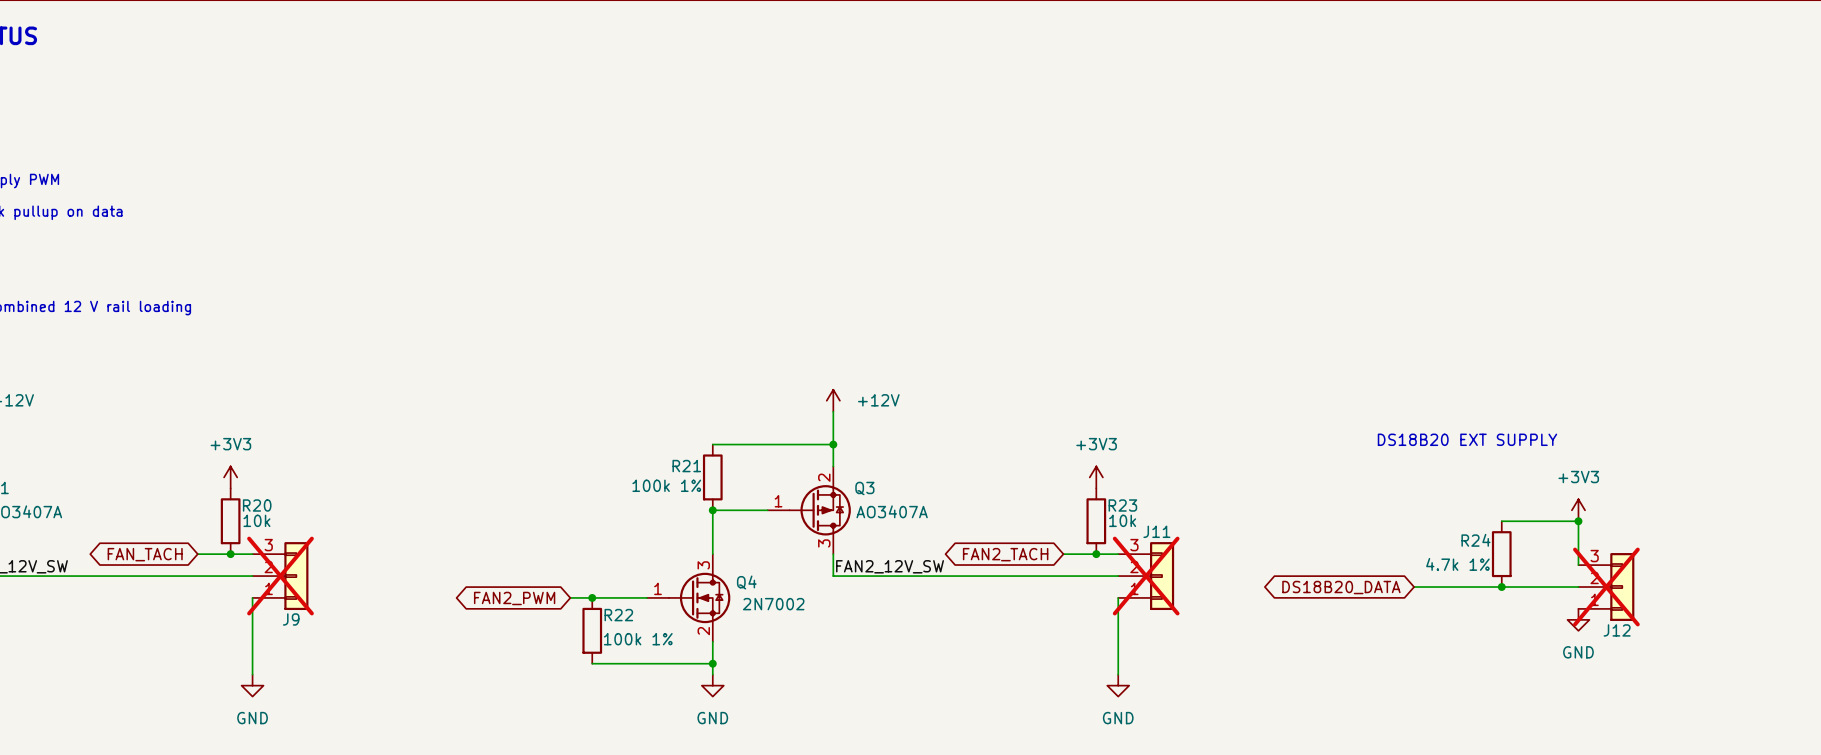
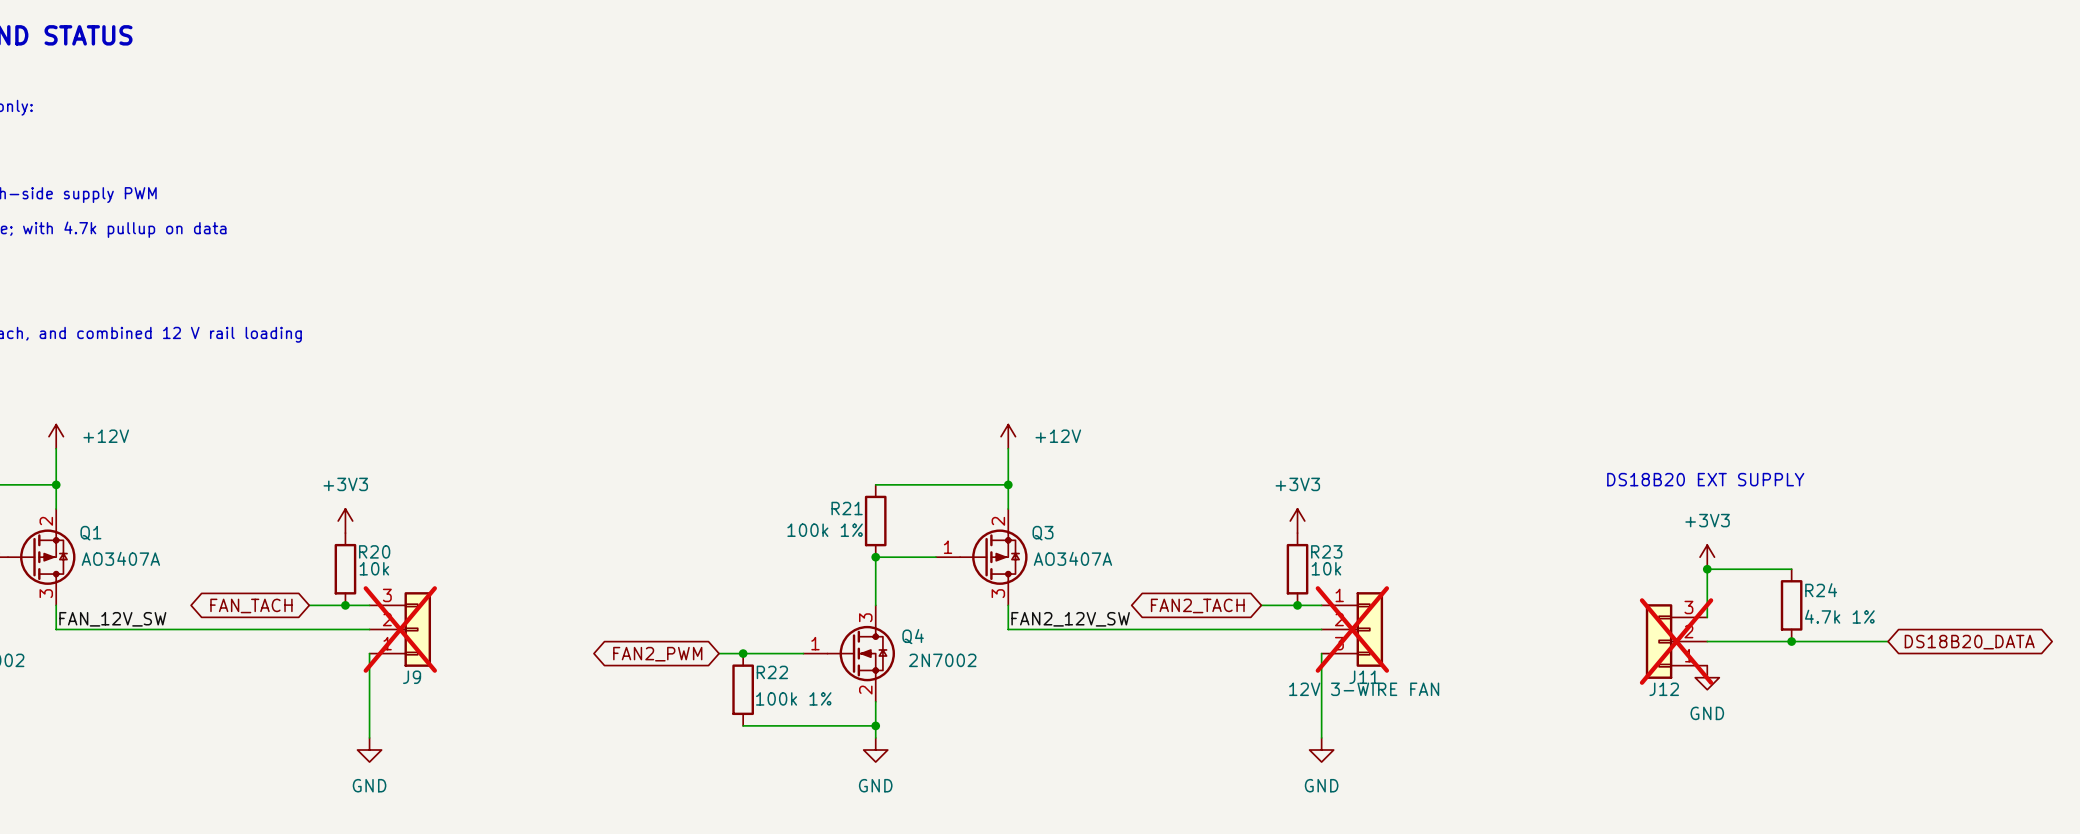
power symbol position: +3V3 (1578, 510) -> +3V3 (1707, 557)
junction: none -> (1707, 569)
wire: none -> (1743, 569) (1707, 569) (1707, 617)
wire: (1545, 521) (1578, 521) (1578, 565) -> none
junction: (1578, 521) -> none
R24 name position: R24 (1475, 540) -> R24 (1821, 590)
R24 position: (1501, 554) -> (1791, 605)
R24 value position: 4.7k 1% (1457, 564) -> 4.7k 1% (1839, 616)
J11 flip: as is (1162, 576) -> up-down (1369, 629)
global label: DS18B20_DATA (1341, 587) -> none
junction: (1501, 587) -> none
junction: none -> (1791, 641)
J12 position: (1606, 587) -> (1676, 641)
J12 flip: as is (1622, 587) -> left-right (1659, 641)
global label: none -> DS18B20_DATA (1969, 642)
power symbol position: GND (1578, 619) -> GND (1707, 677)
J11 value: none -> 12V 3-WIRE FAN (1364, 689)

